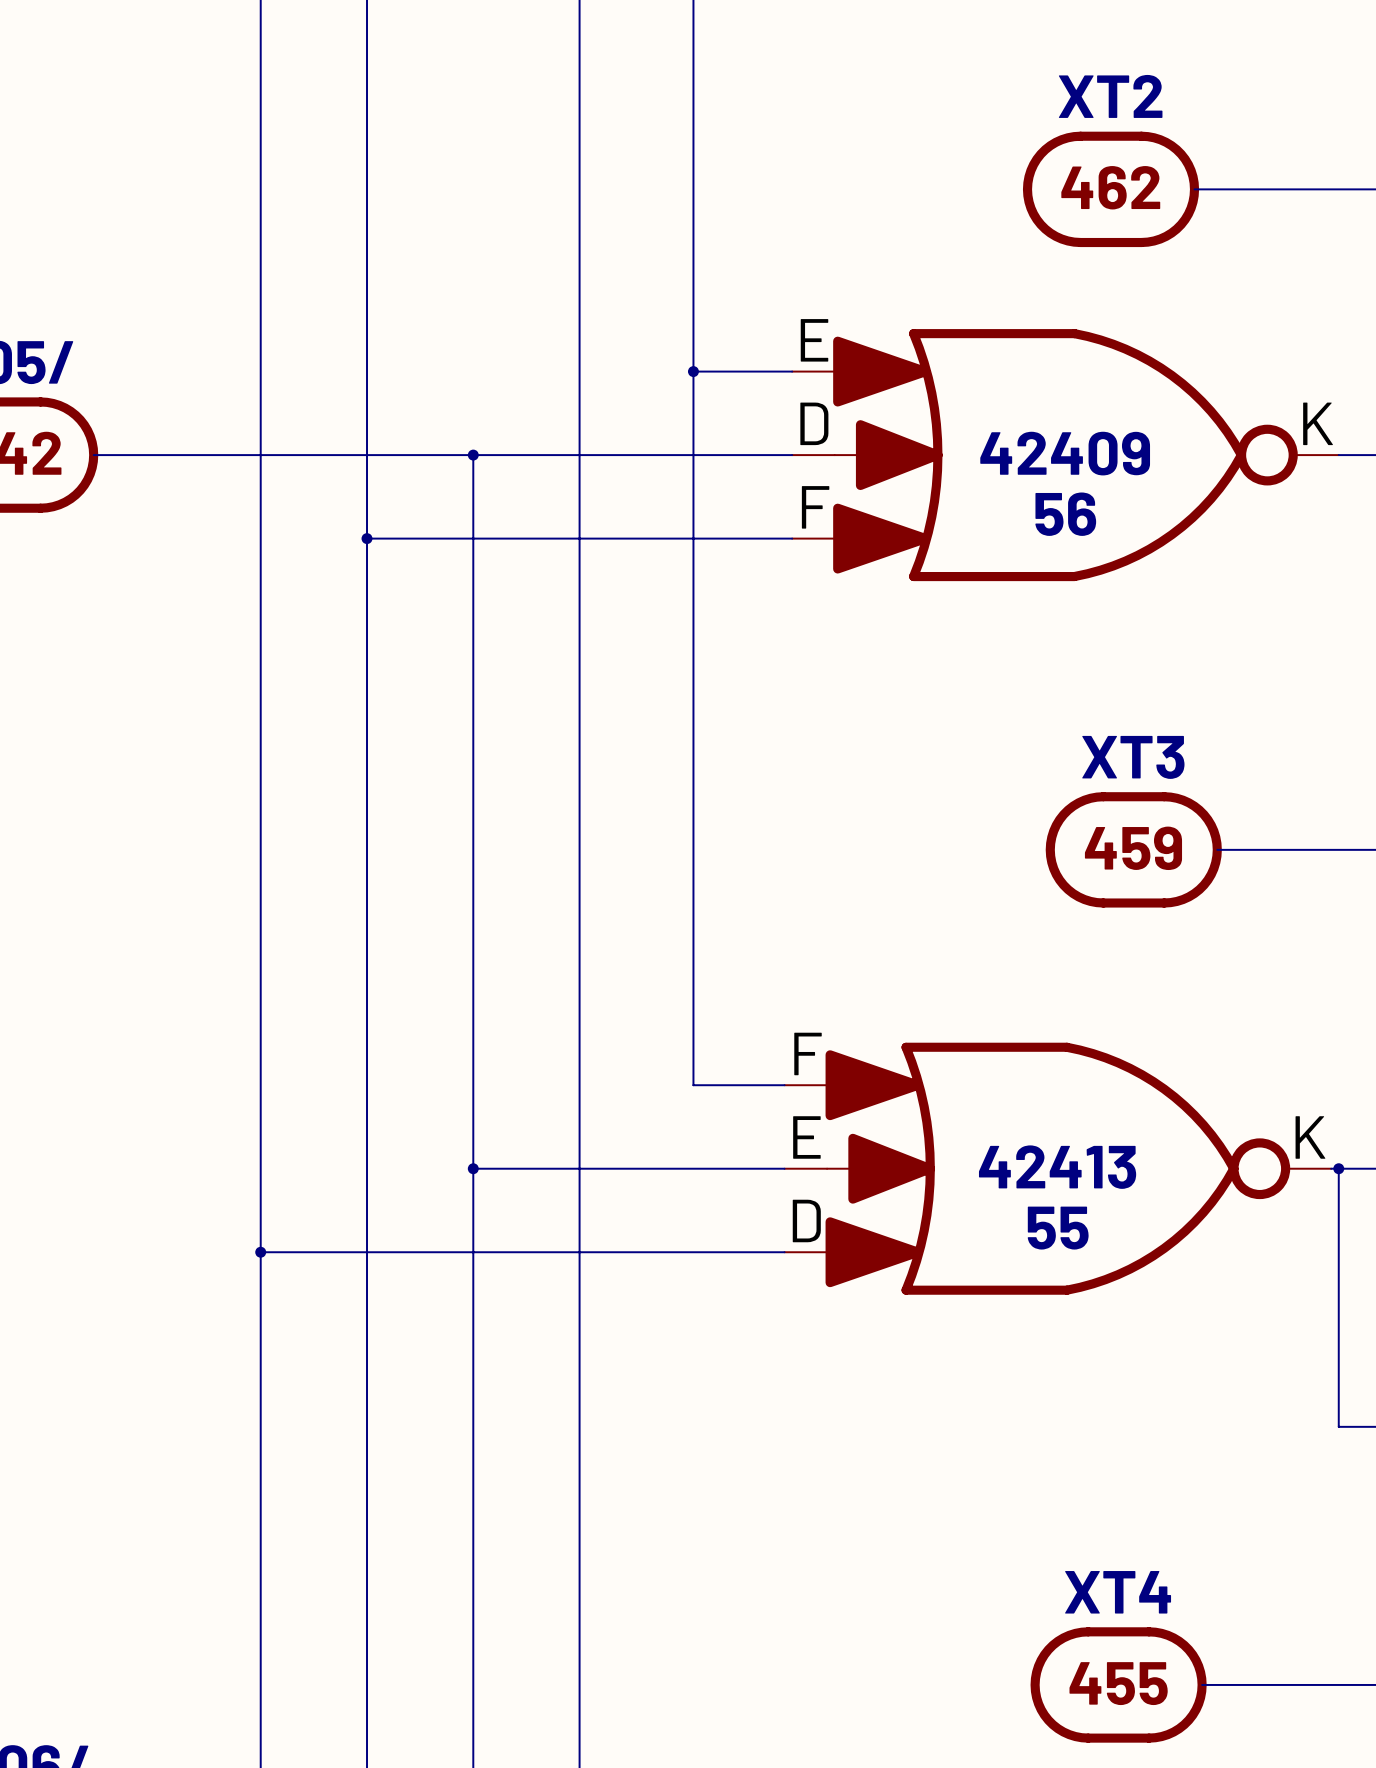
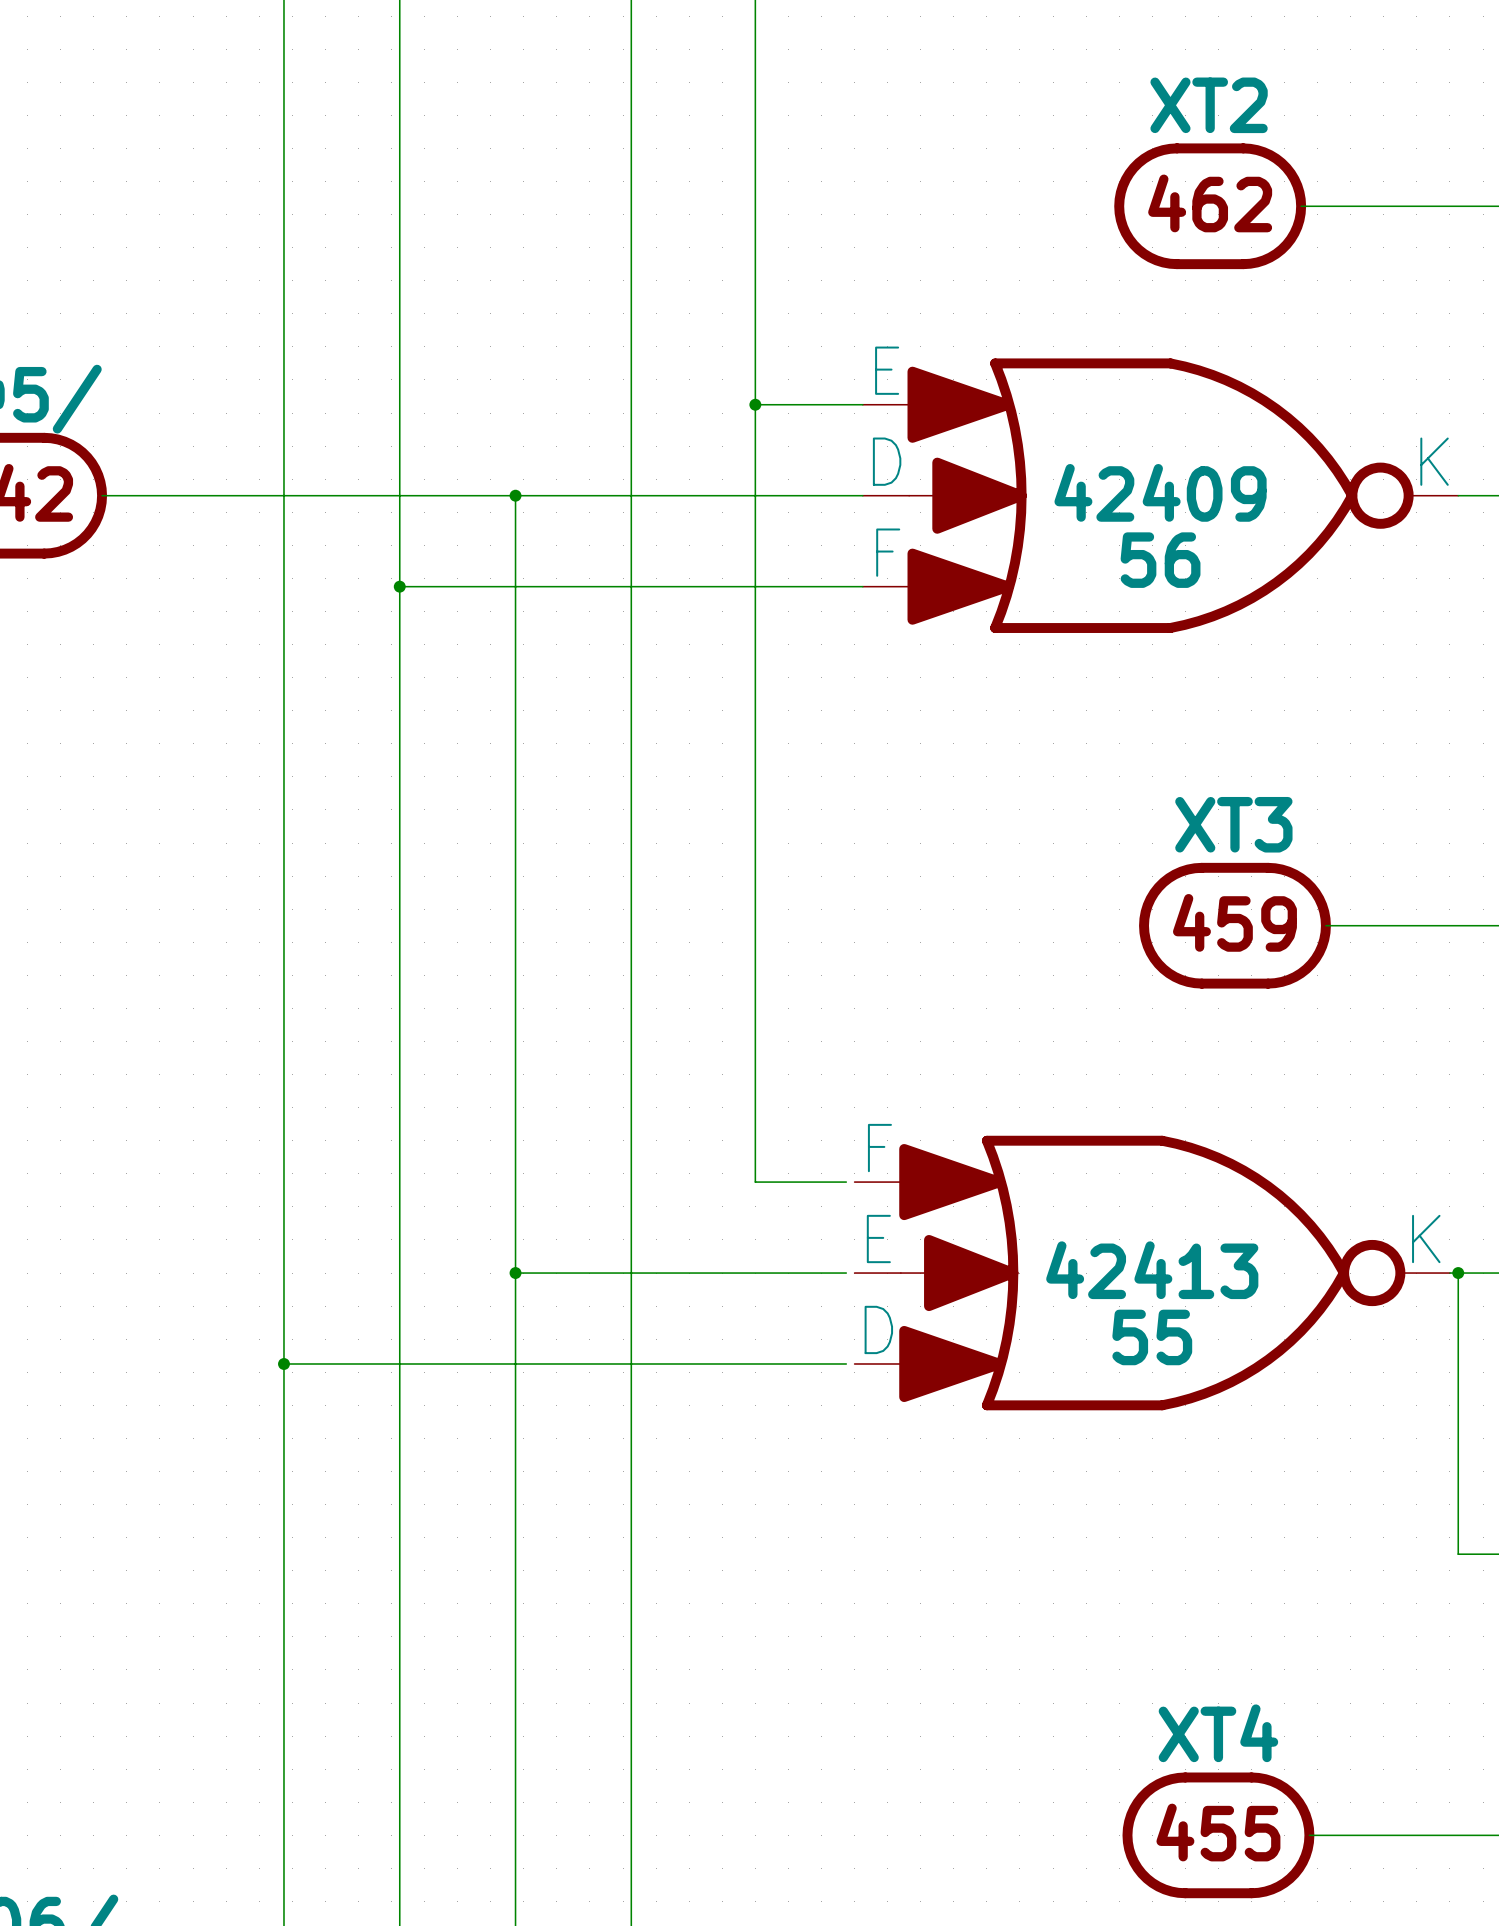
wire: (776, 1085) (784, 1085) -> none
wire: (776, 1168) (784, 1168) -> none
wire: (776, 1252) (784, 1252) -> none

